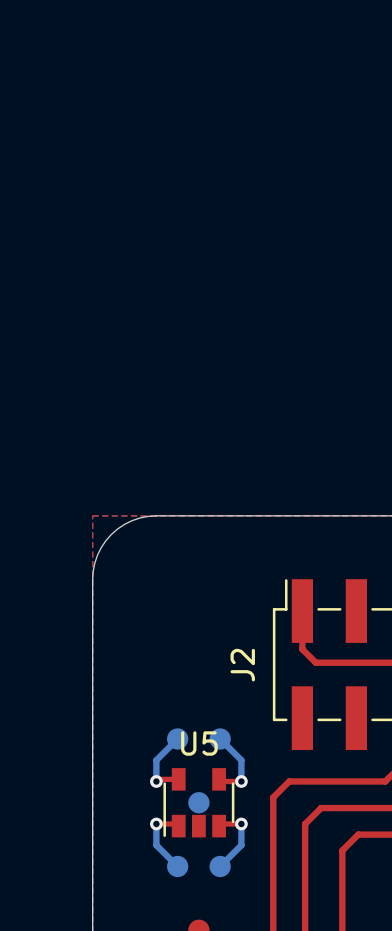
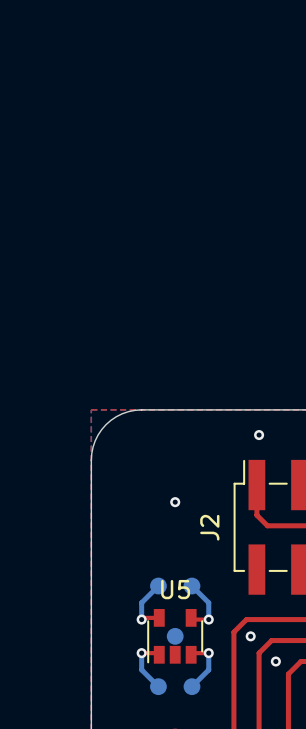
via: none -> (259, 435)
via: none -> (175, 502)
via: none -> (250, 636)
via: none -> (275, 661)

